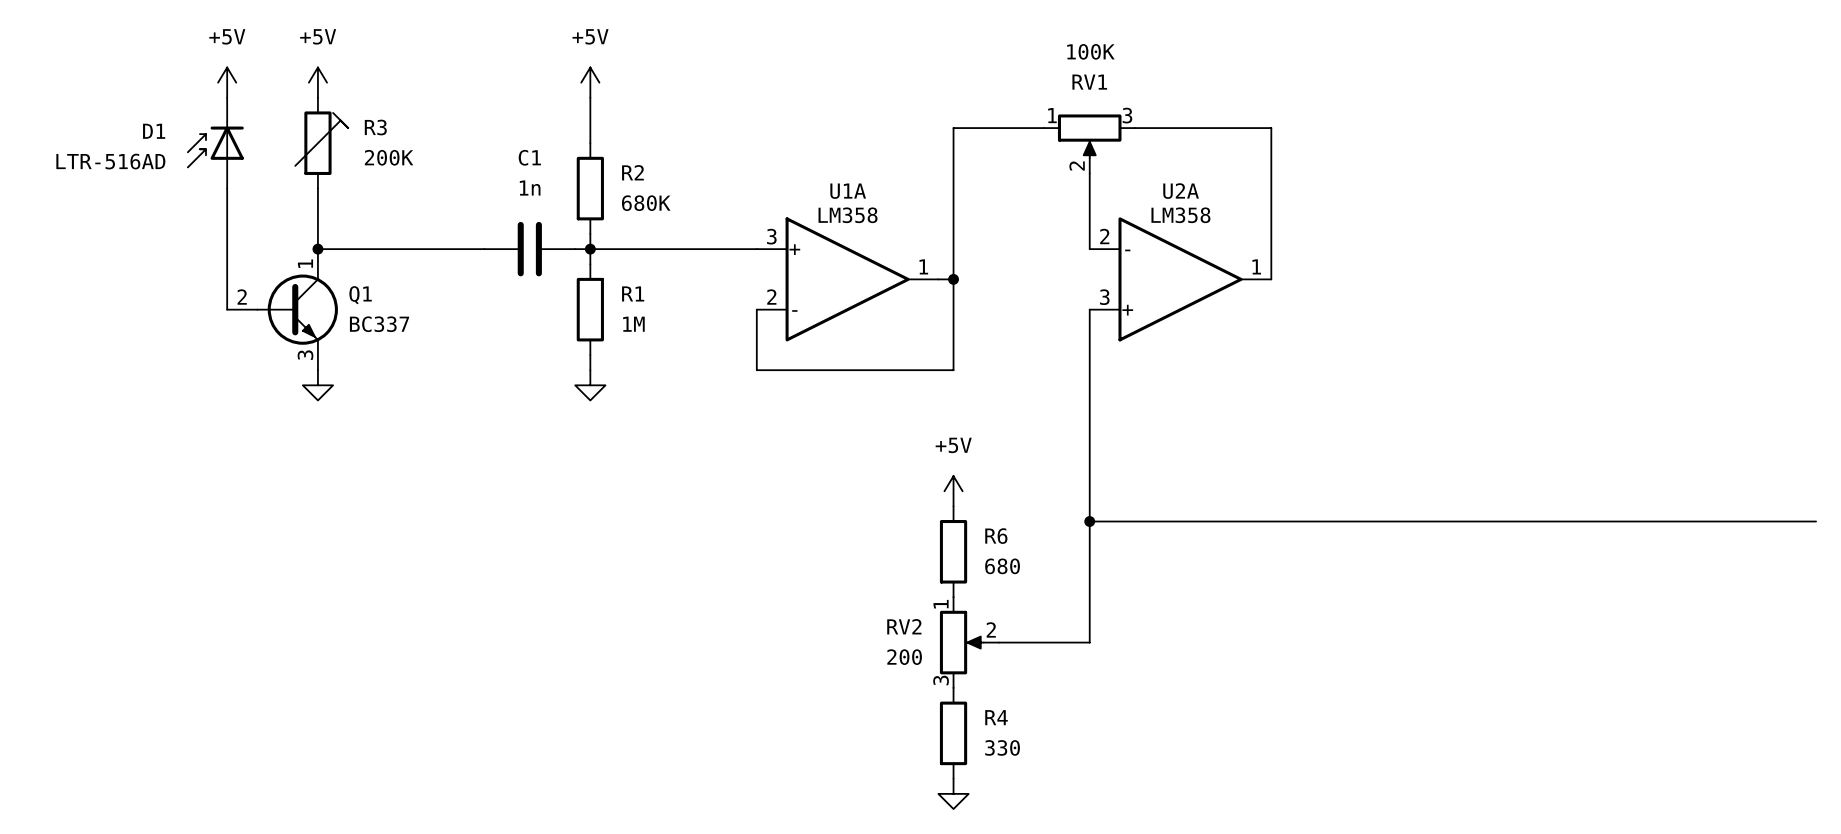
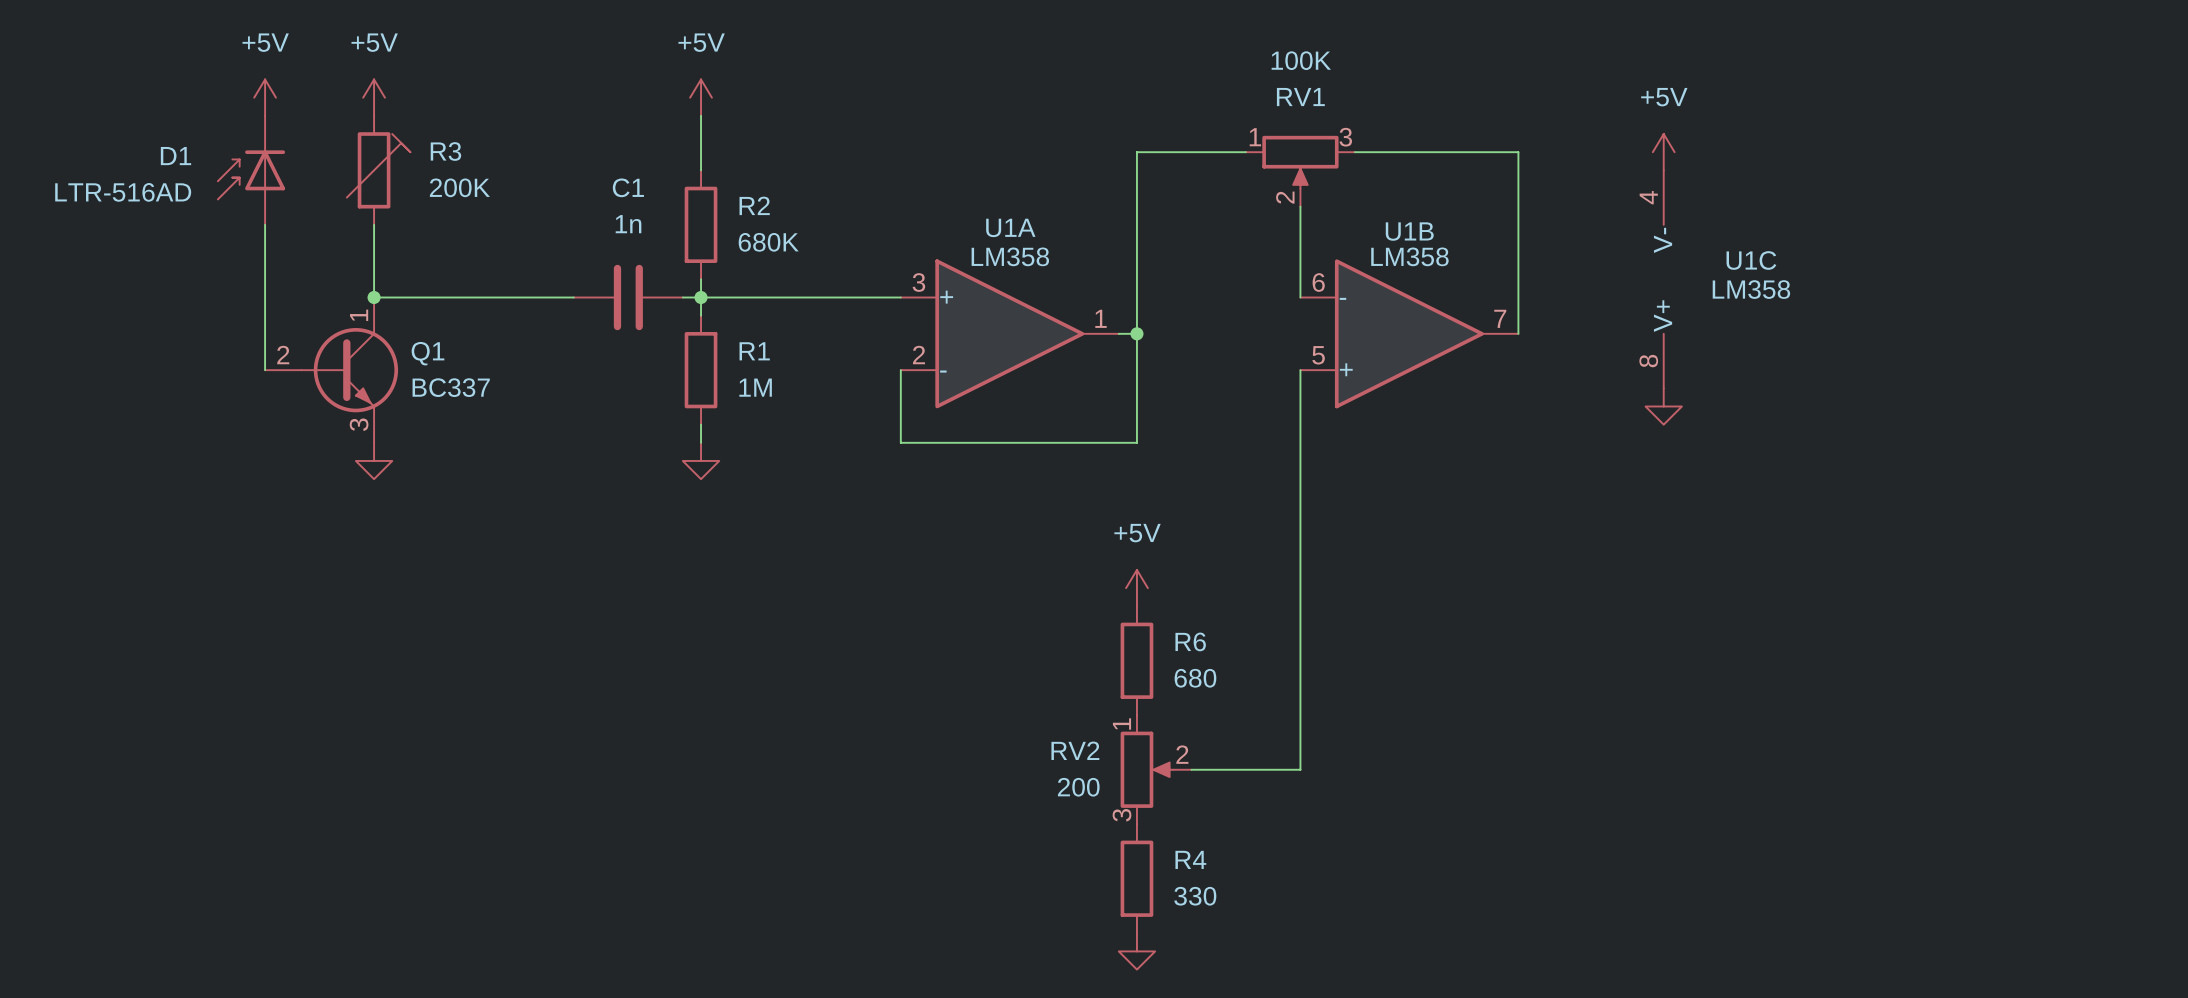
power symbol: none -> +5V (1663, 152)
U2A name: U2A (1181, 191) -> U1B (1409, 231)
U1C: none -> LM358 (1663, 279)
U2A pin number: 2 (1104, 236) -> 6 (1318, 282)
U2A pin number: 1 (1256, 266) -> 7 (1500, 318)
U2A pin number: 3 (1104, 297) -> 5 (1318, 355)
power symbol: none -> (1663, 406)
wire: (1089, 521) (1816, 521) -> none
junction: (1089, 521) -> none

